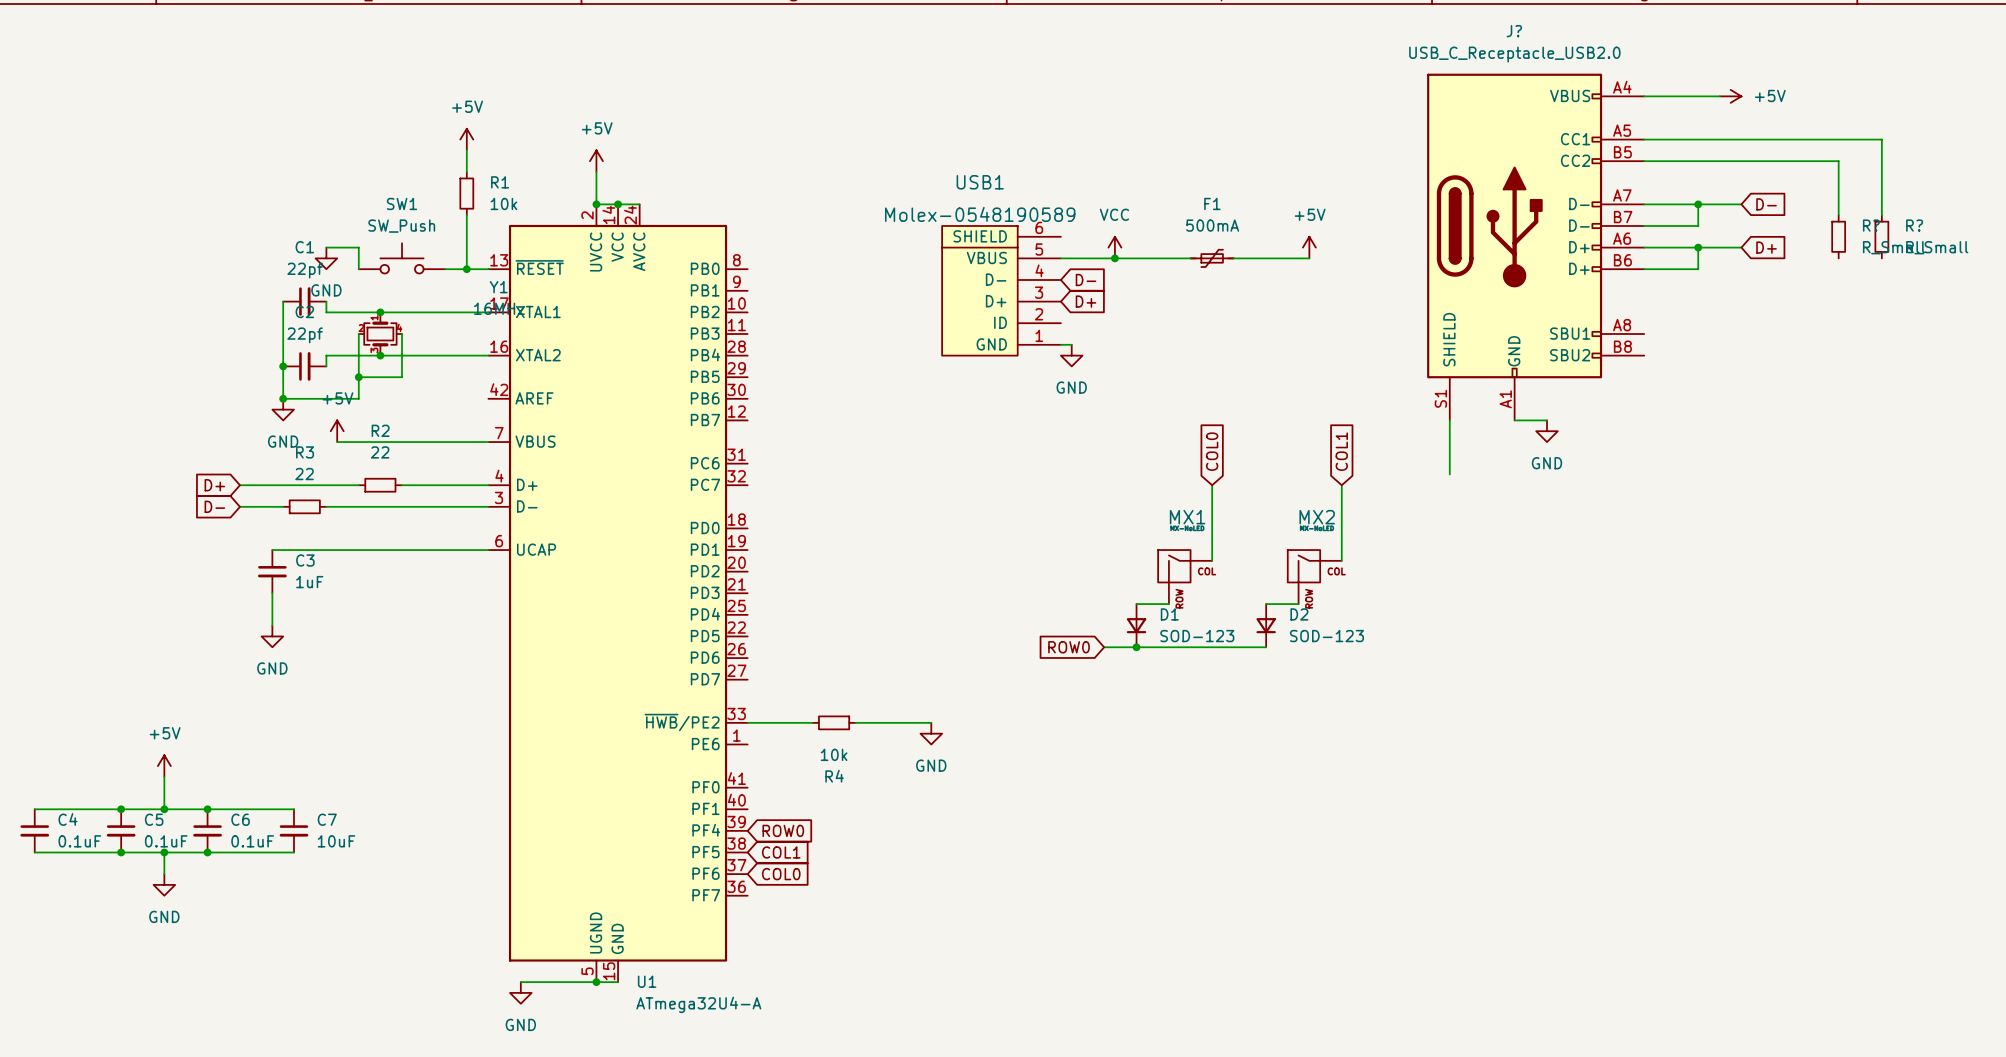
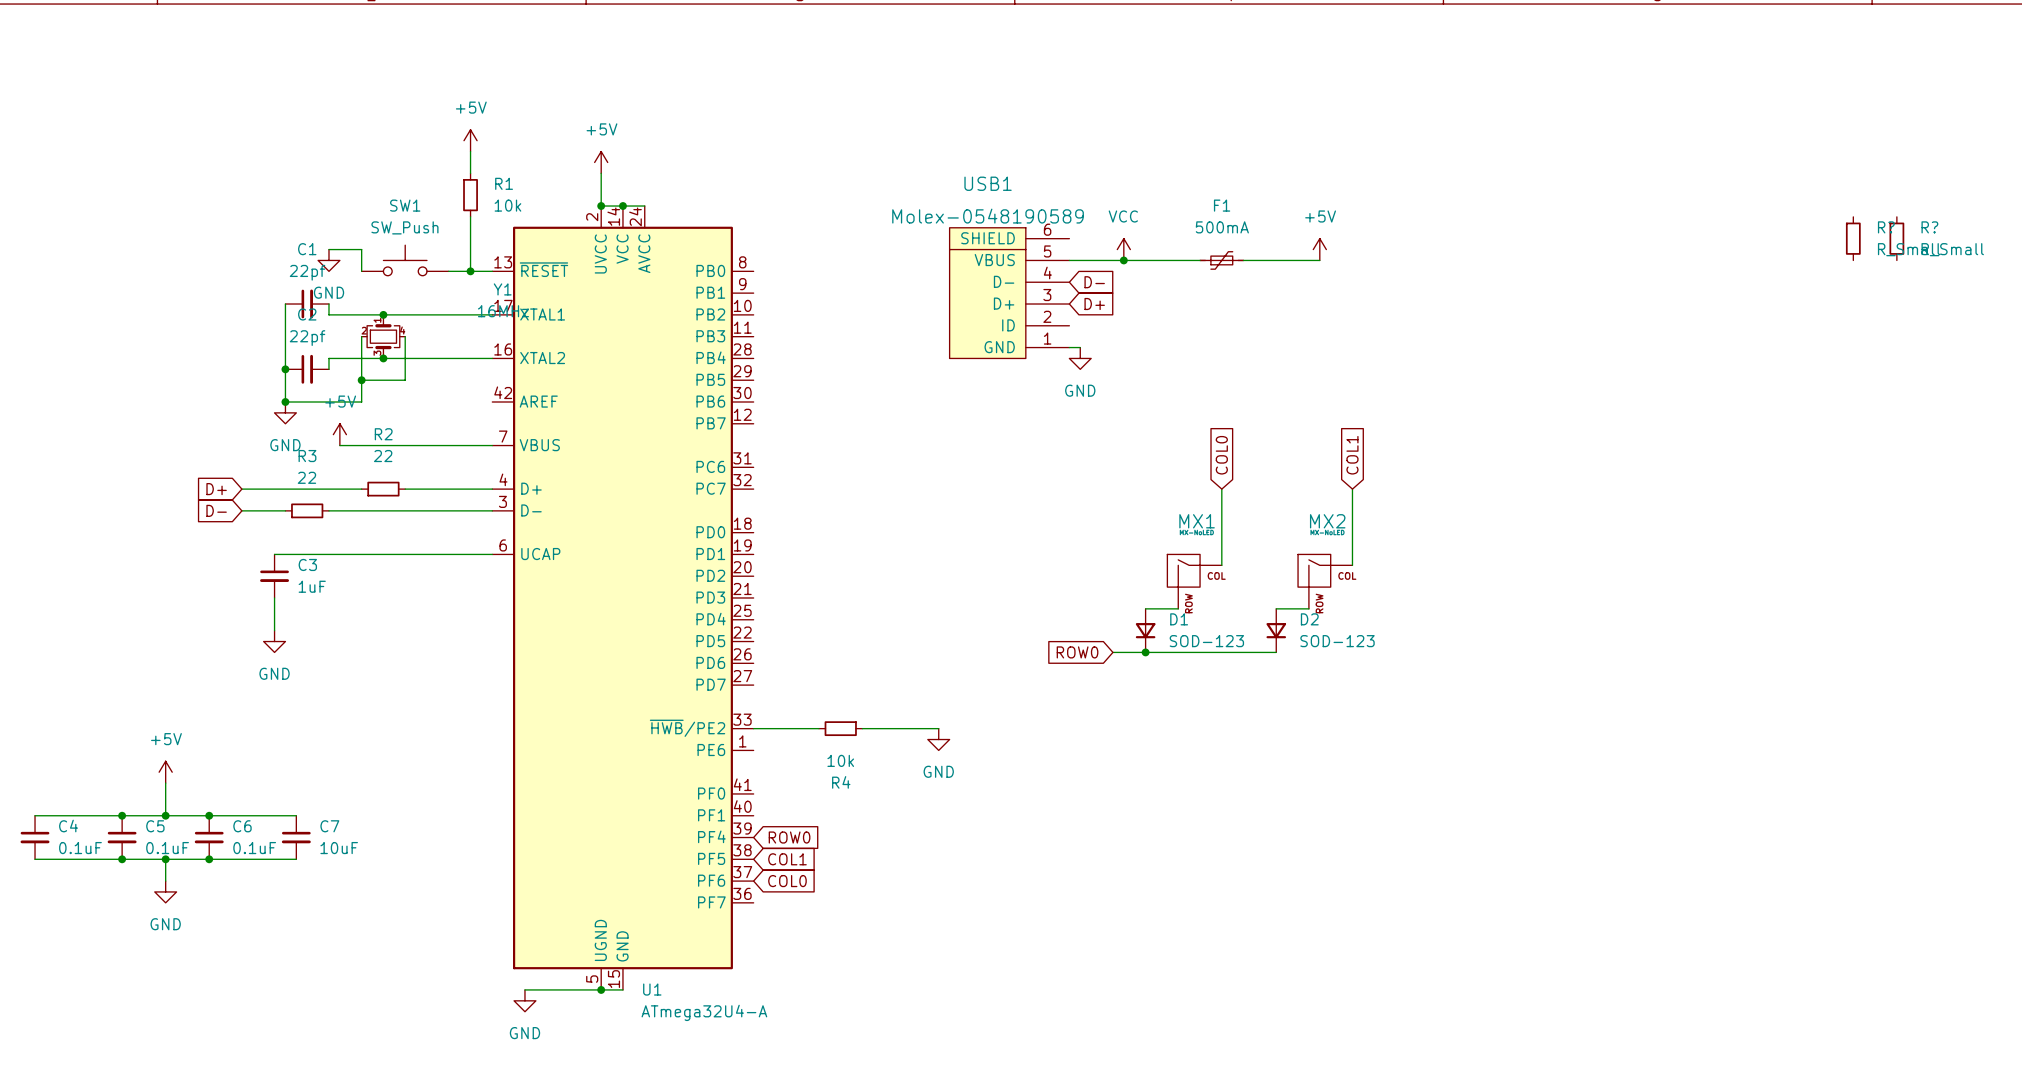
wire: (1644, 96) (1719, 96) -> none
power symbol: +5V (1730, 96) -> none
wire: (1644, 139) (1881, 139) (1881, 215) -> none
wire: (1644, 161) (1838, 161) (1838, 215) -> none
wire: (1644, 204) (1741, 204) -> none
wire: (1698, 204) (1698, 225) (1644, 225) -> none
junction: (1698, 204) -> none
global label: D- (1766, 204) -> none
J?: USB_C_Receptacle_USB2.0 (1535, 247) -> none
wire: (1644, 247) (1741, 247) -> none
wire: (1698, 247) (1698, 269) (1644, 269) -> none
junction: (1698, 247) -> none
global label: D+ (1766, 247) -> none
wire: (1449, 420) (1449, 474) -> none
wire: (1514, 420) (1547, 420) -> none
power symbol: GND (1547, 431) -> none

